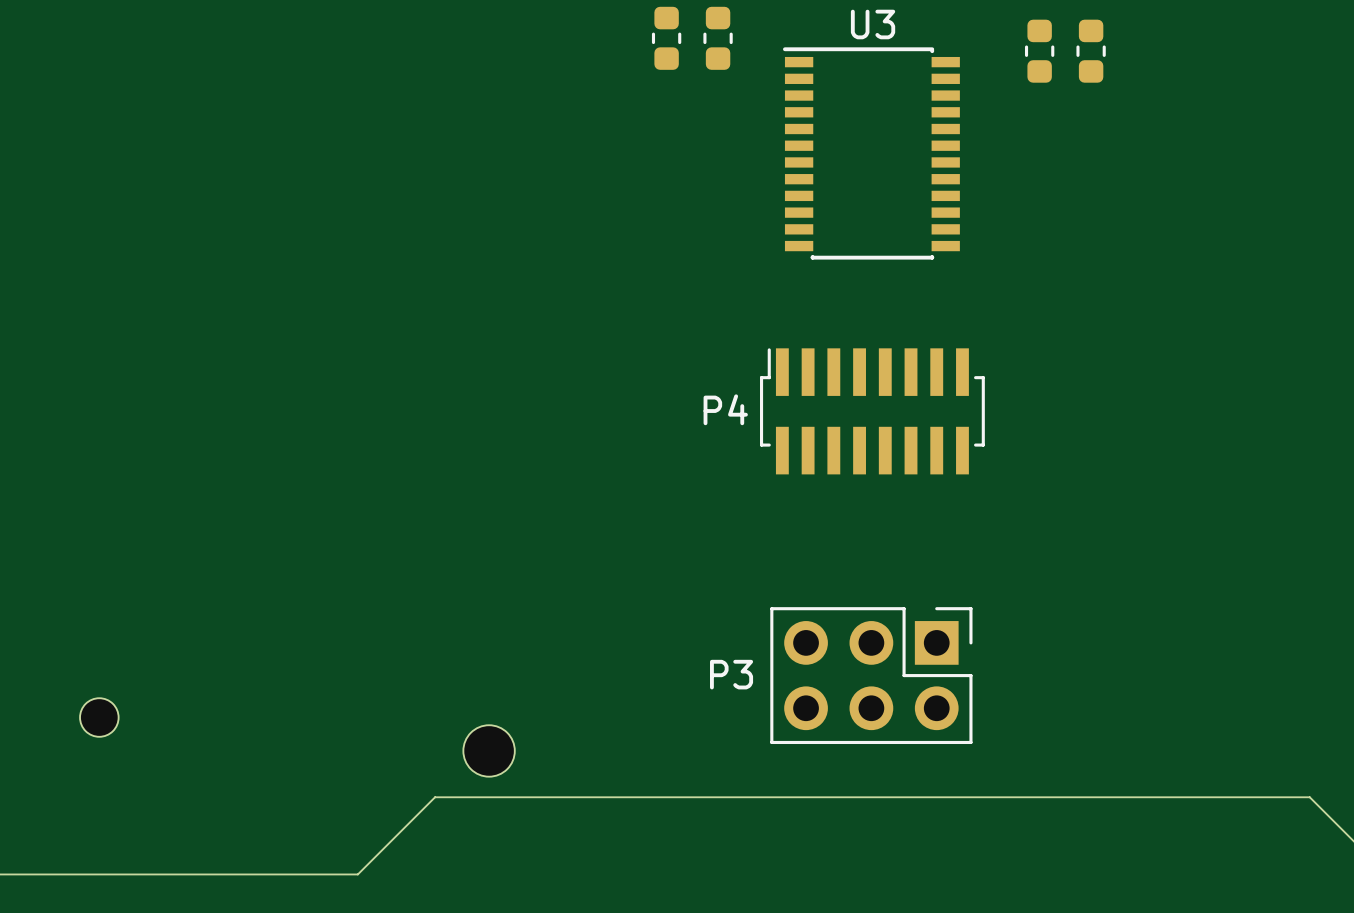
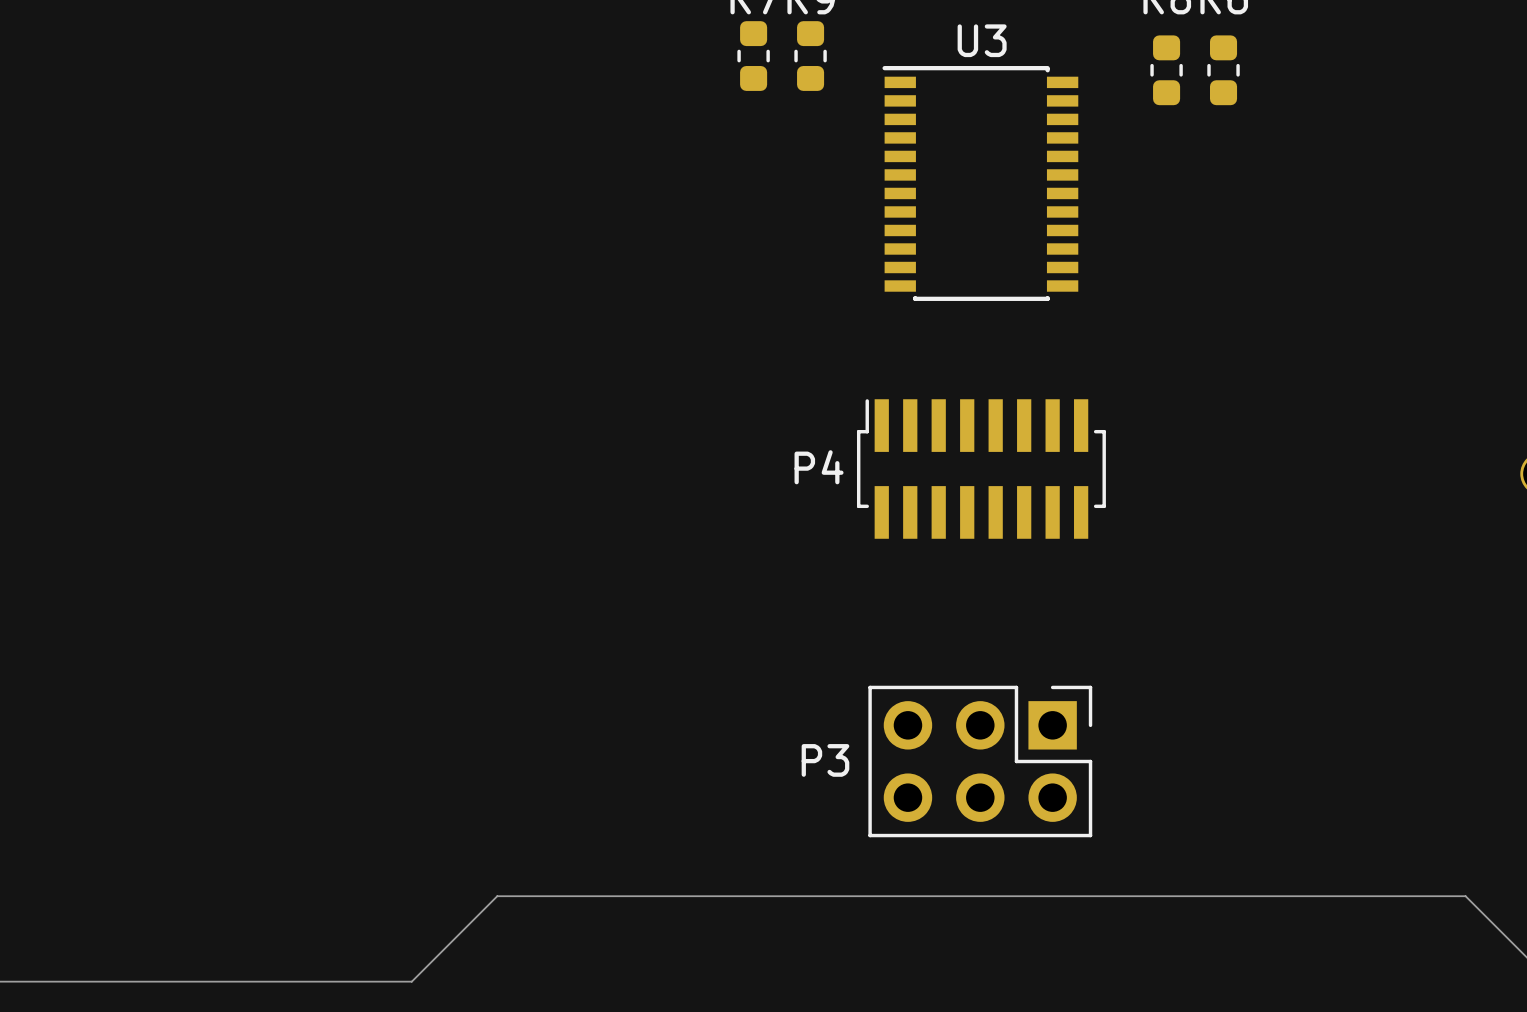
part: (99, 717) -> none
part: (489, 750) -> none

